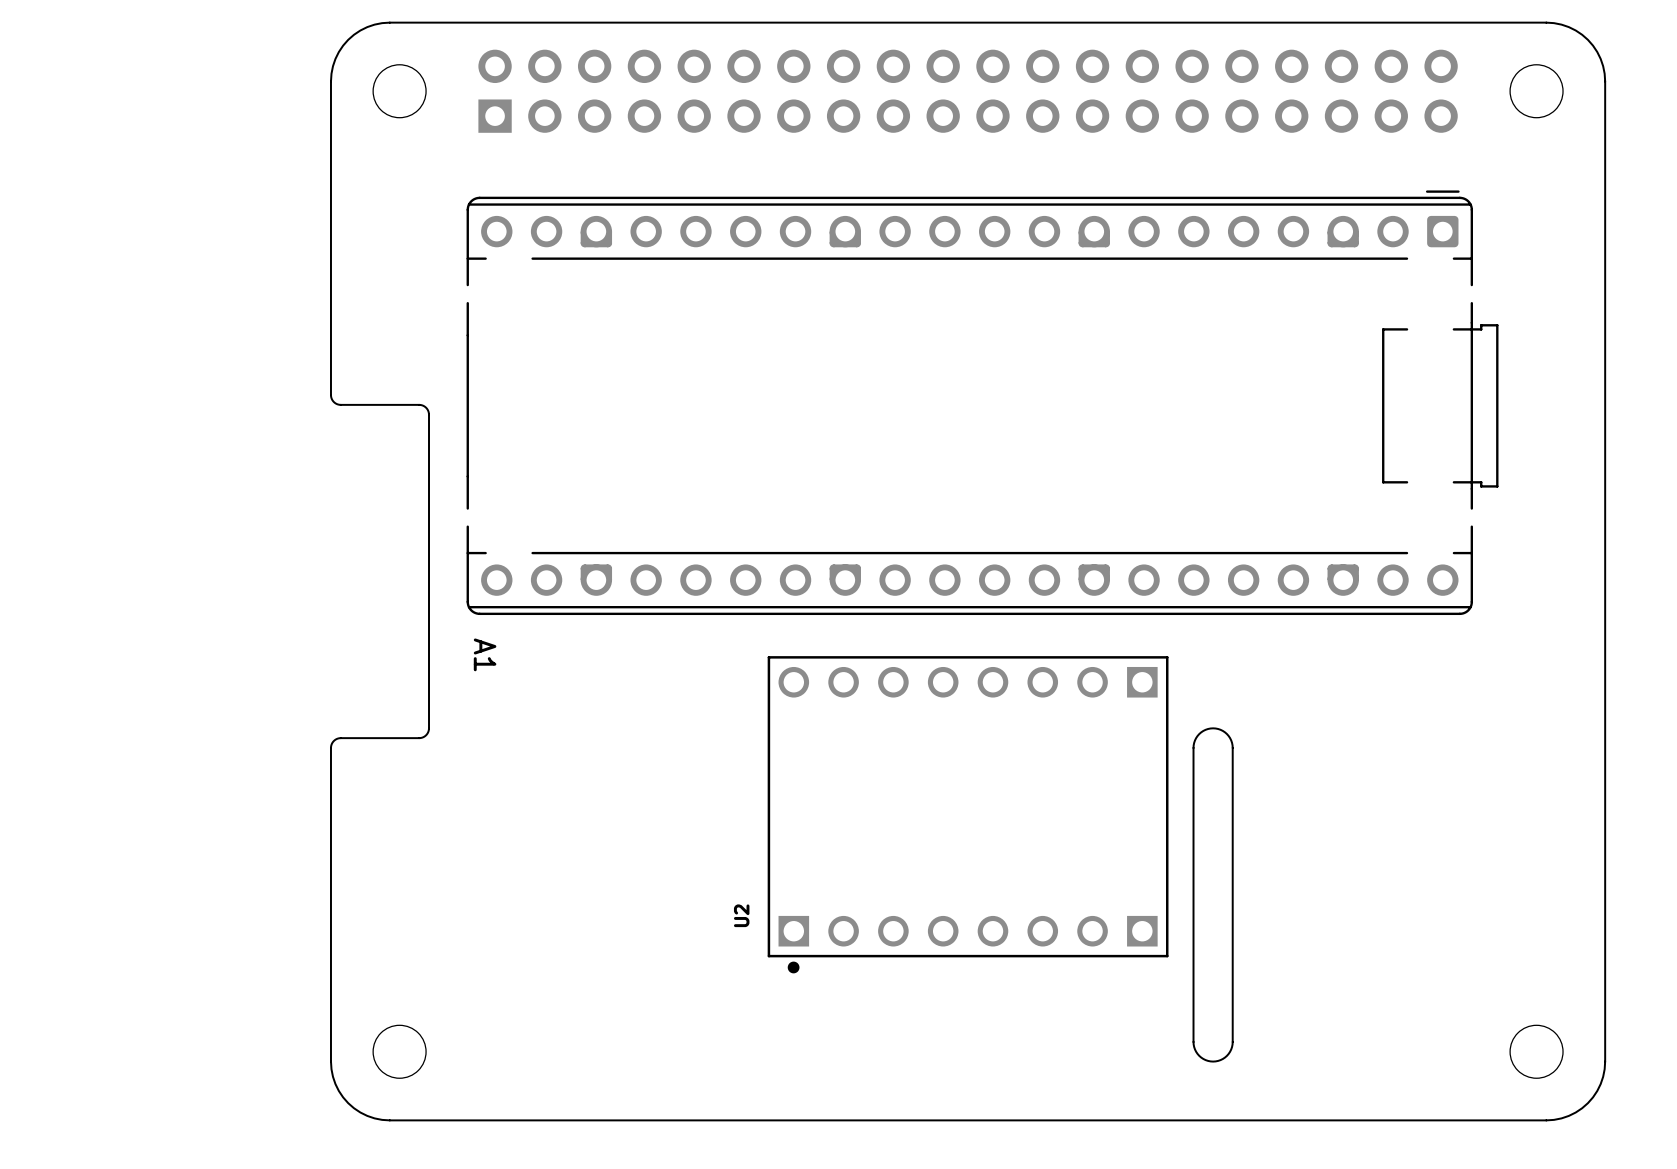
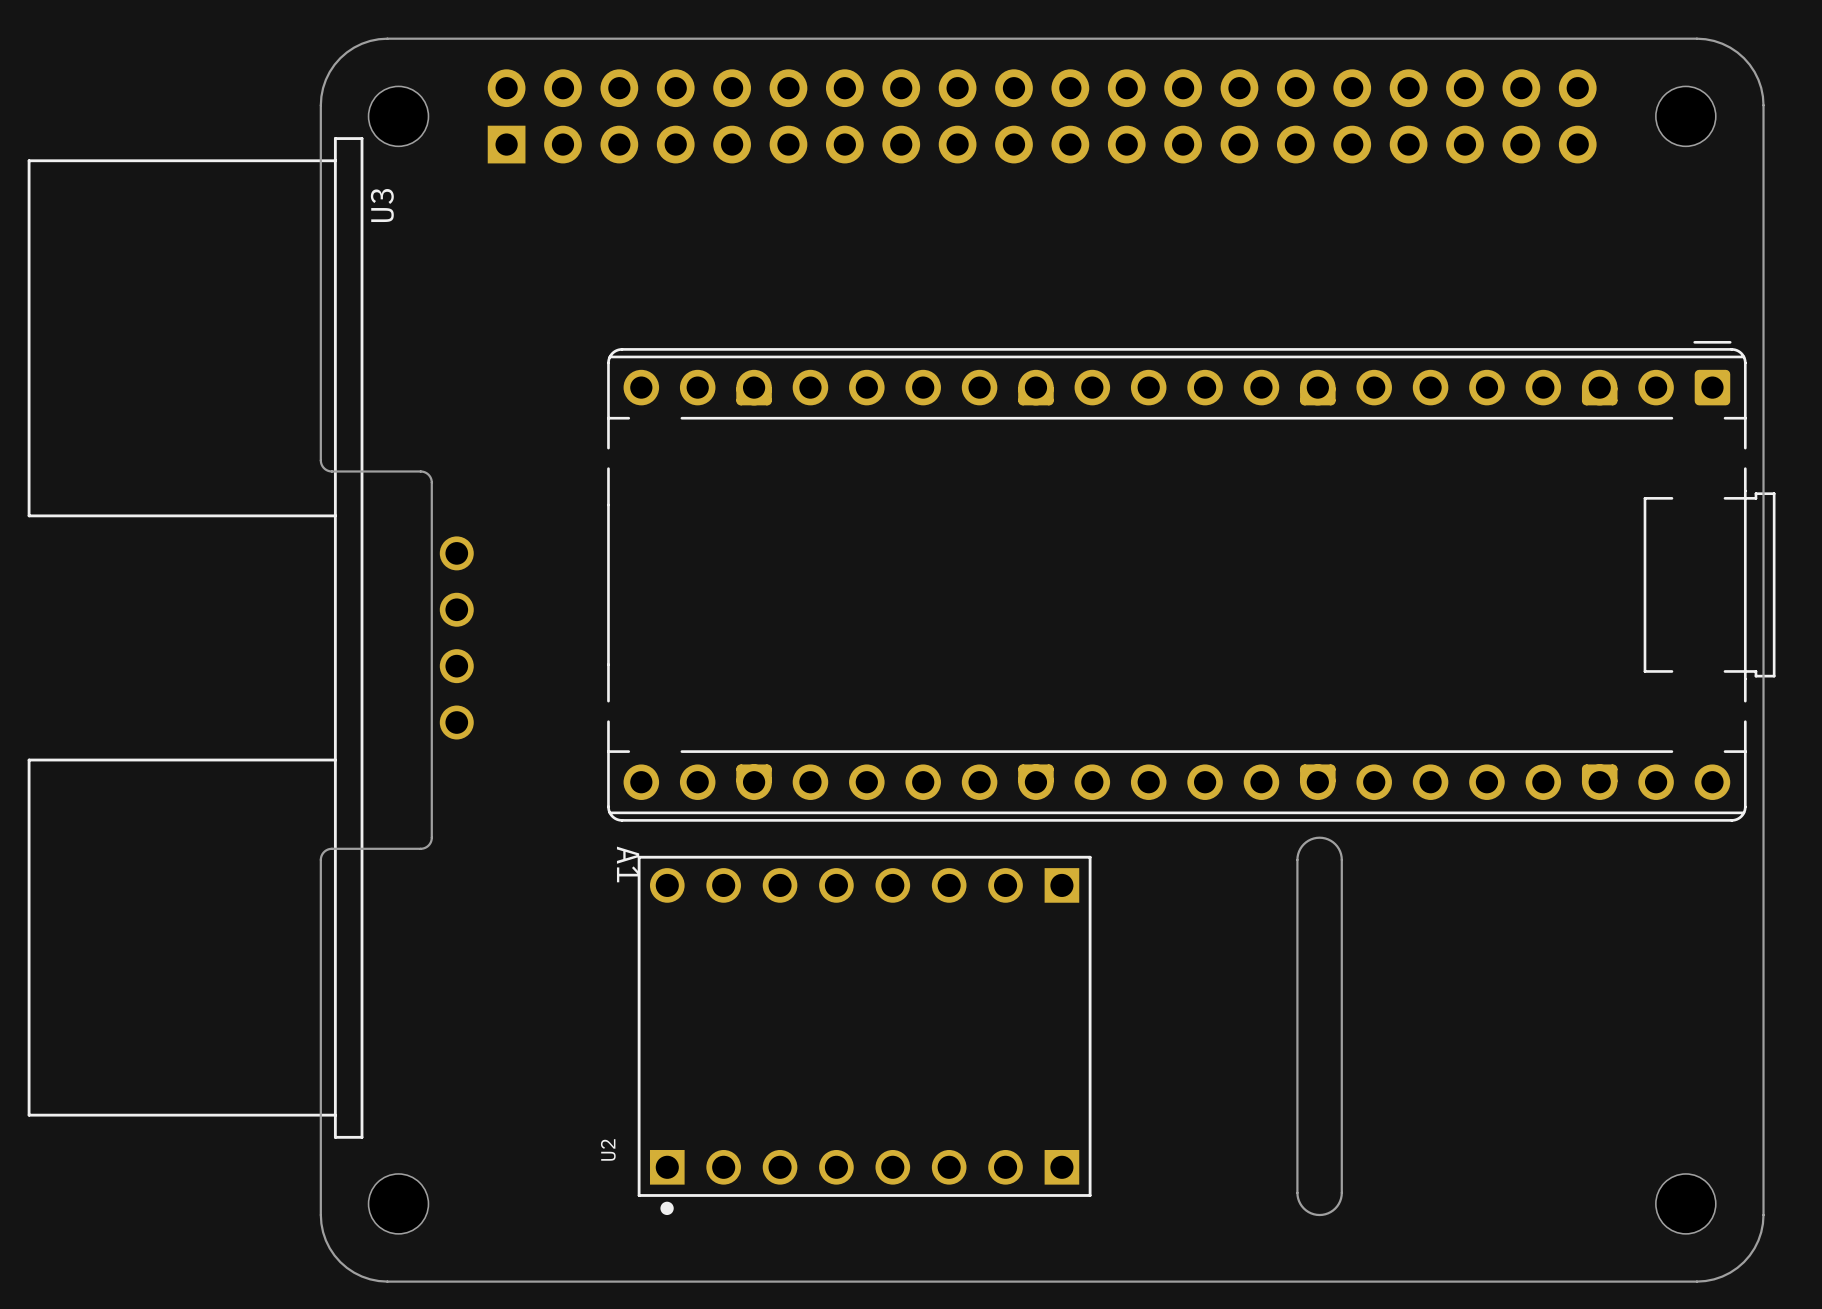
A1 position: (982, 402) -> (1191, 581)
U3: none -> (250, 637)
U2 position: (968, 814) -> (864, 1035)

